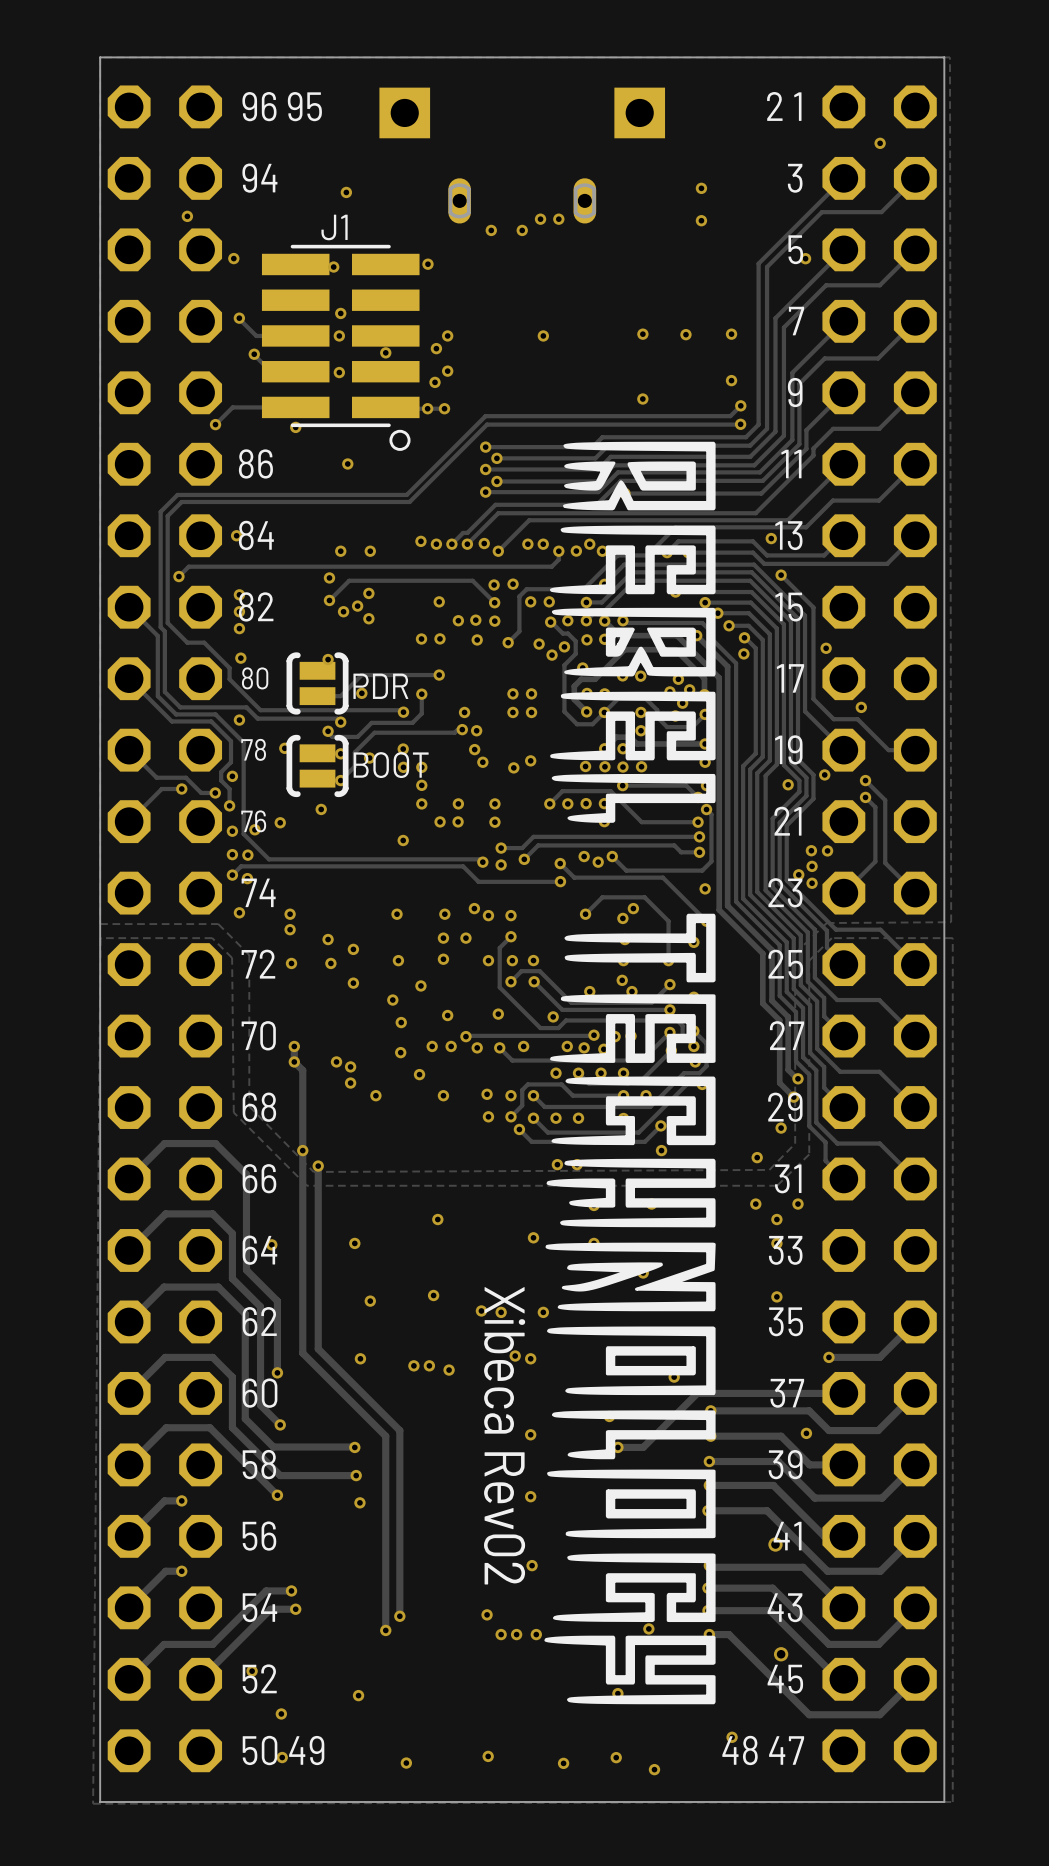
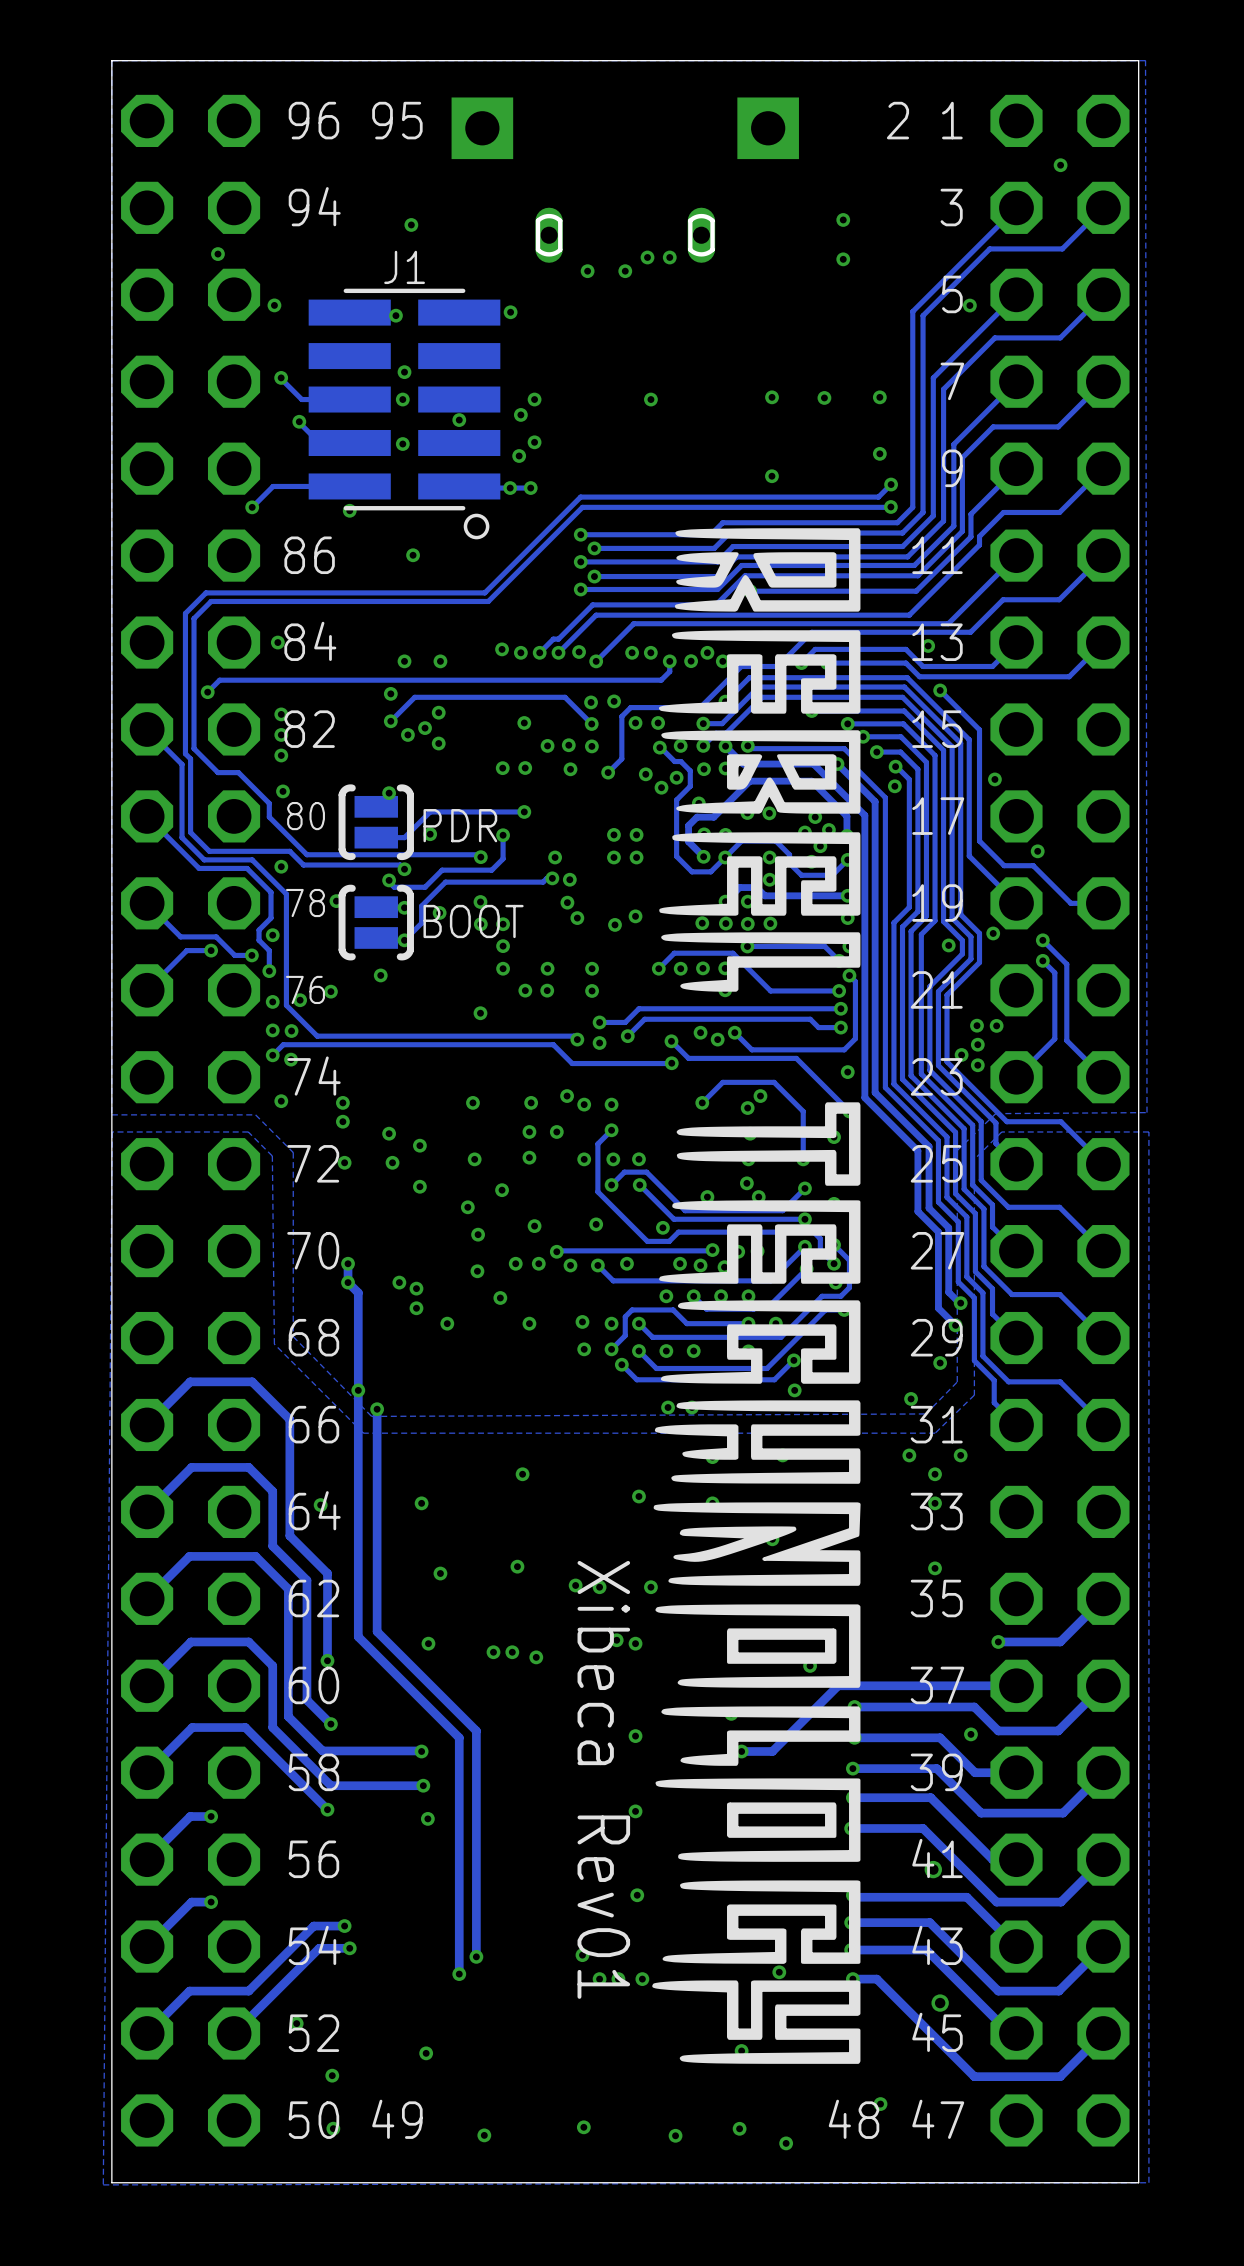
text: Xibeca Rev02 (504, 1435) -> Xibeca Rev01 (603, 1779)

